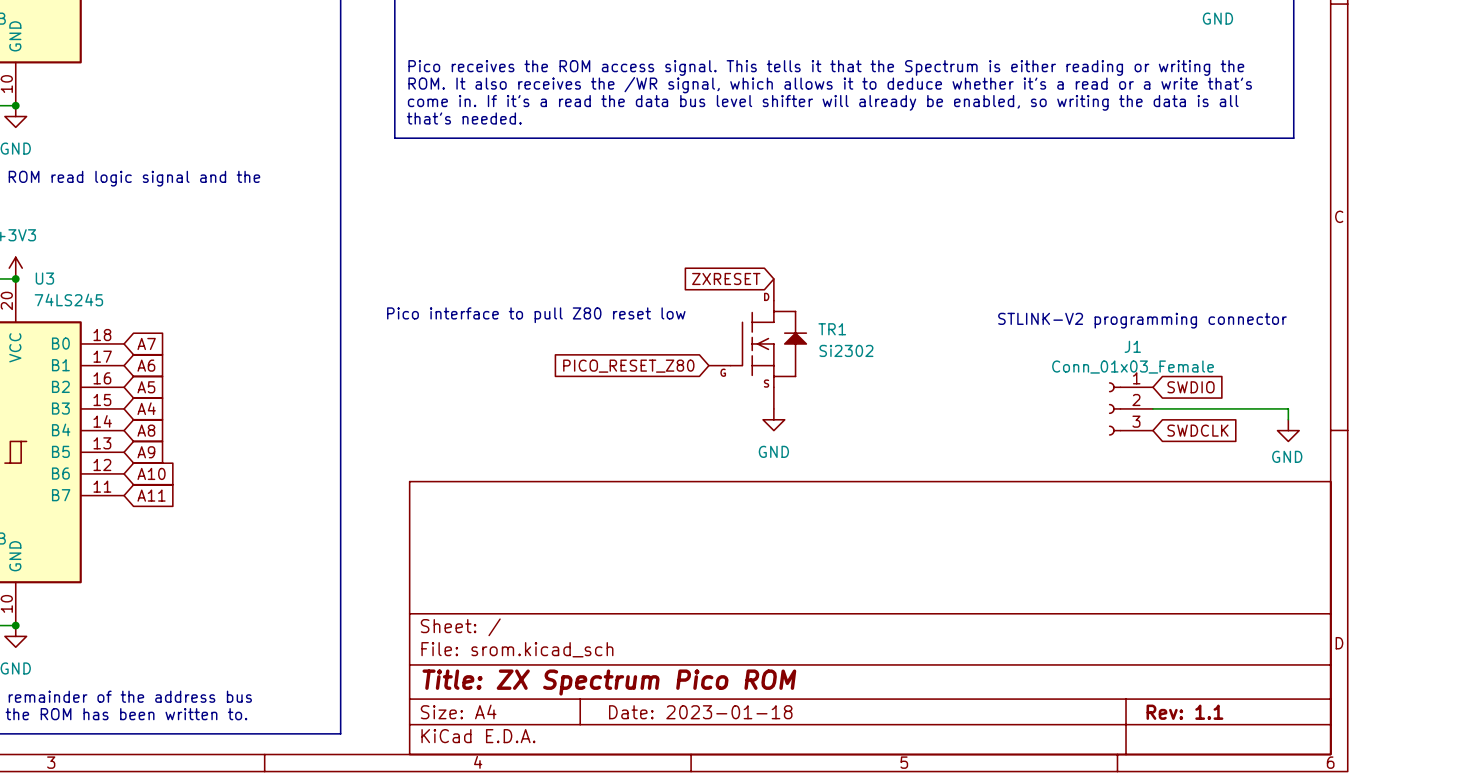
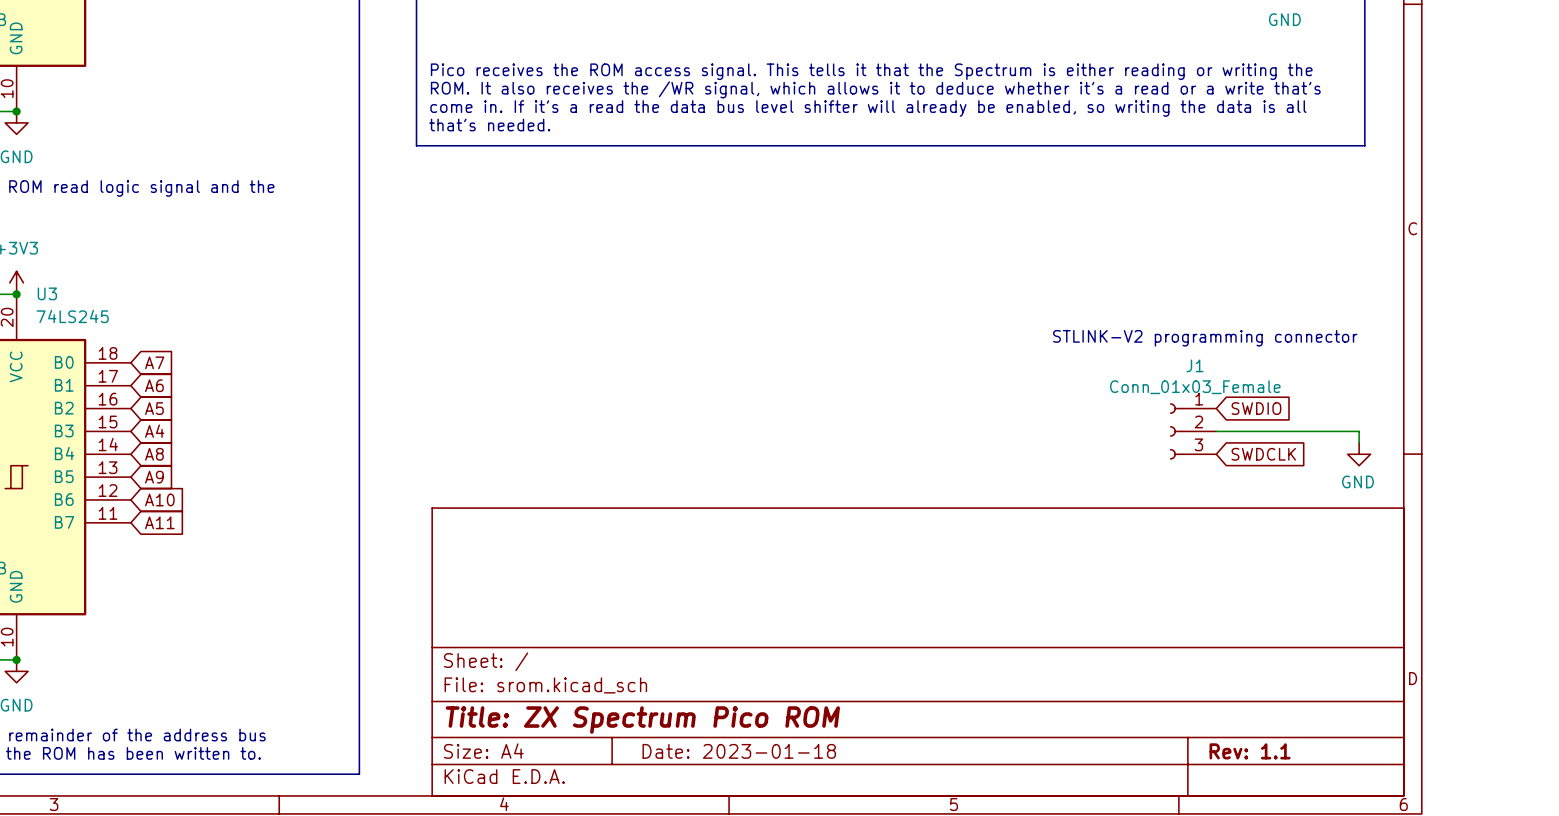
global label: ZXRESET (726, 278) -> none
text: Pico interface to pull Z80 reset low (536, 315) -> none
TR1: Si2302 (757, 343) -> none
global label: PICO_RESET_Z80 (628, 366) -> none
power symbol: GND (773, 419) -> none

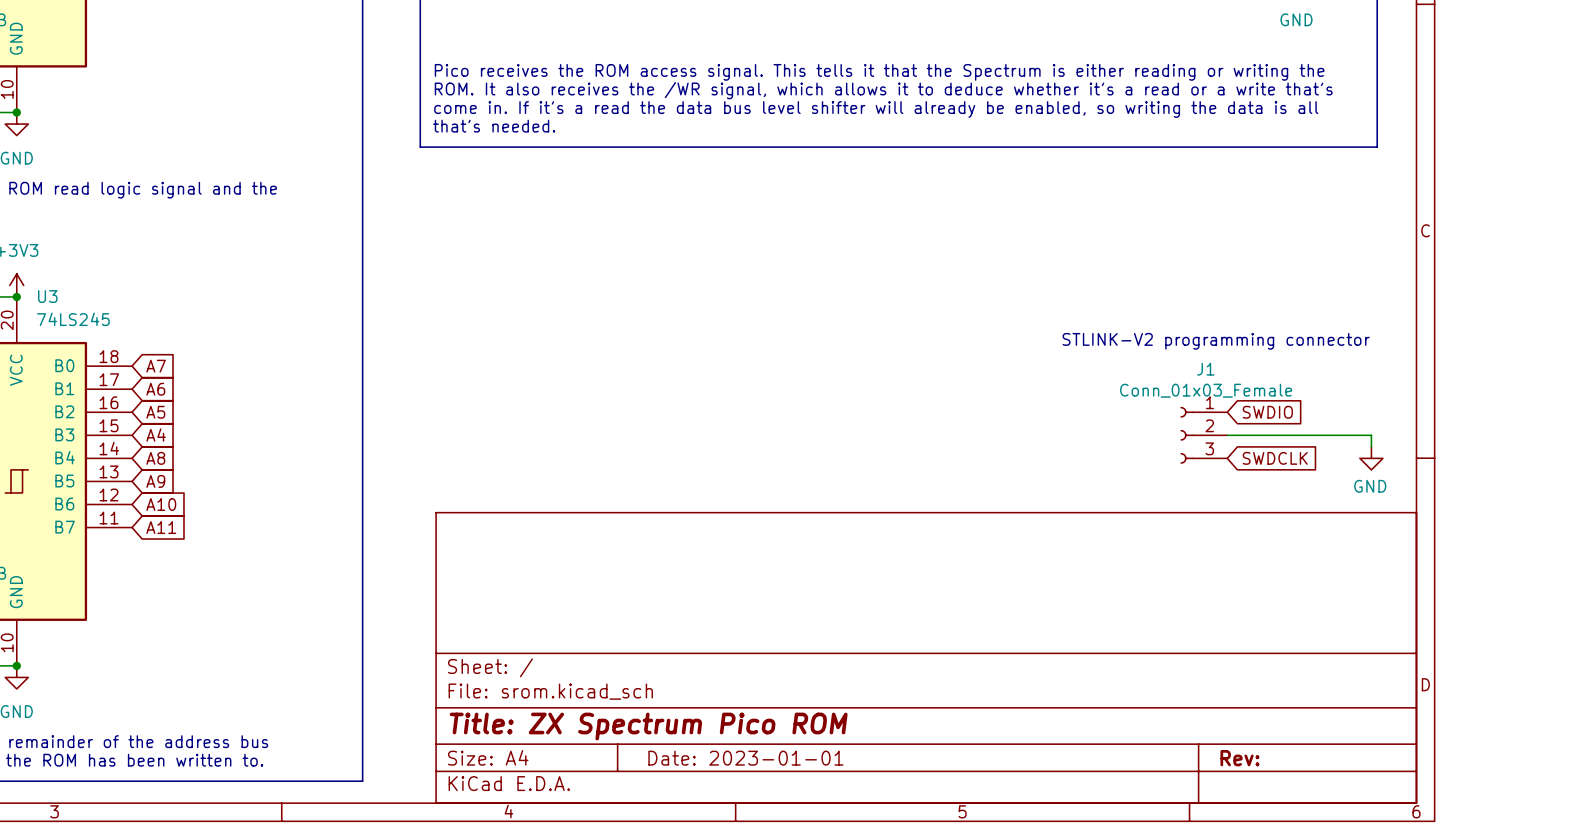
title block: Date: 2023-01-18 (739, 751) -> Date: 2023-01-01 (745, 758)
title block: Rev: 1.1 (1250, 751) -> Rev: (1239, 758)

